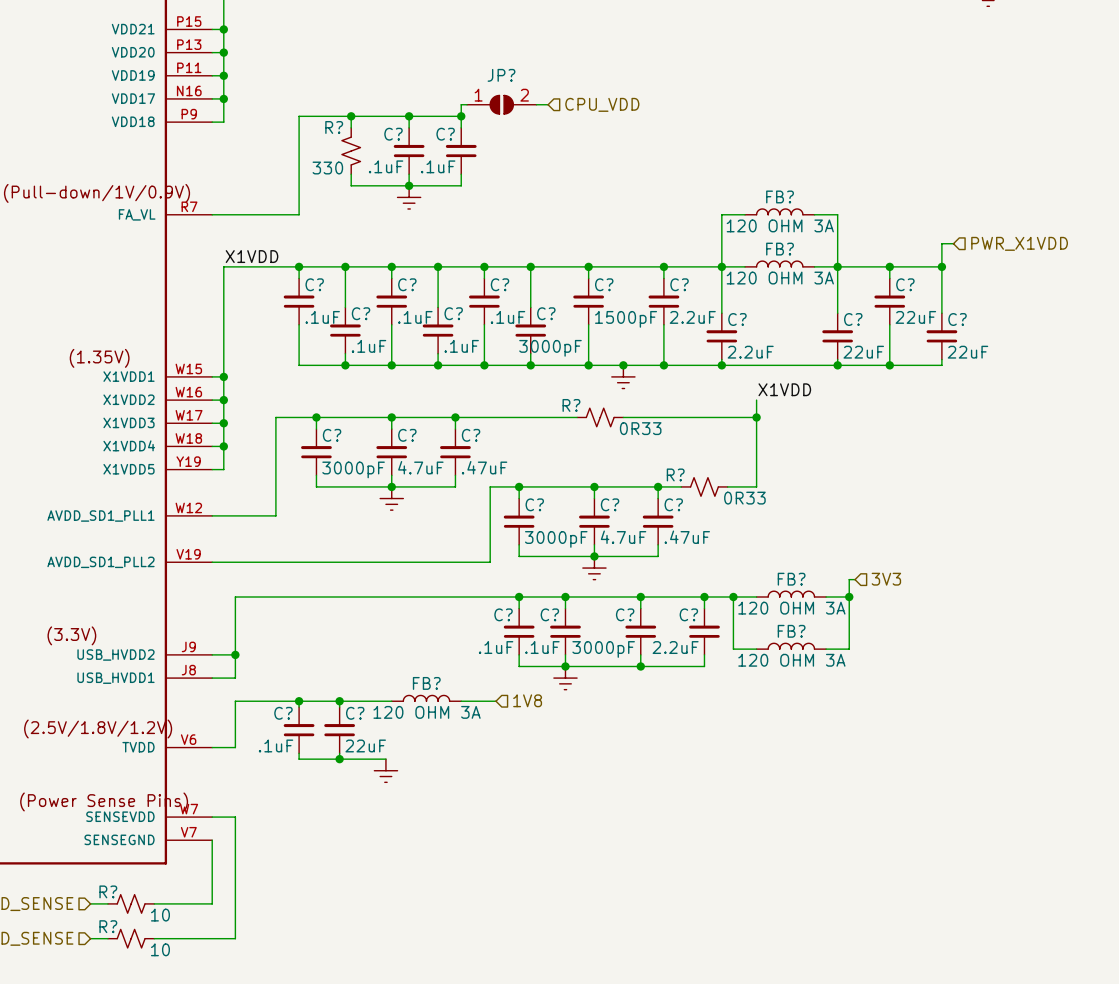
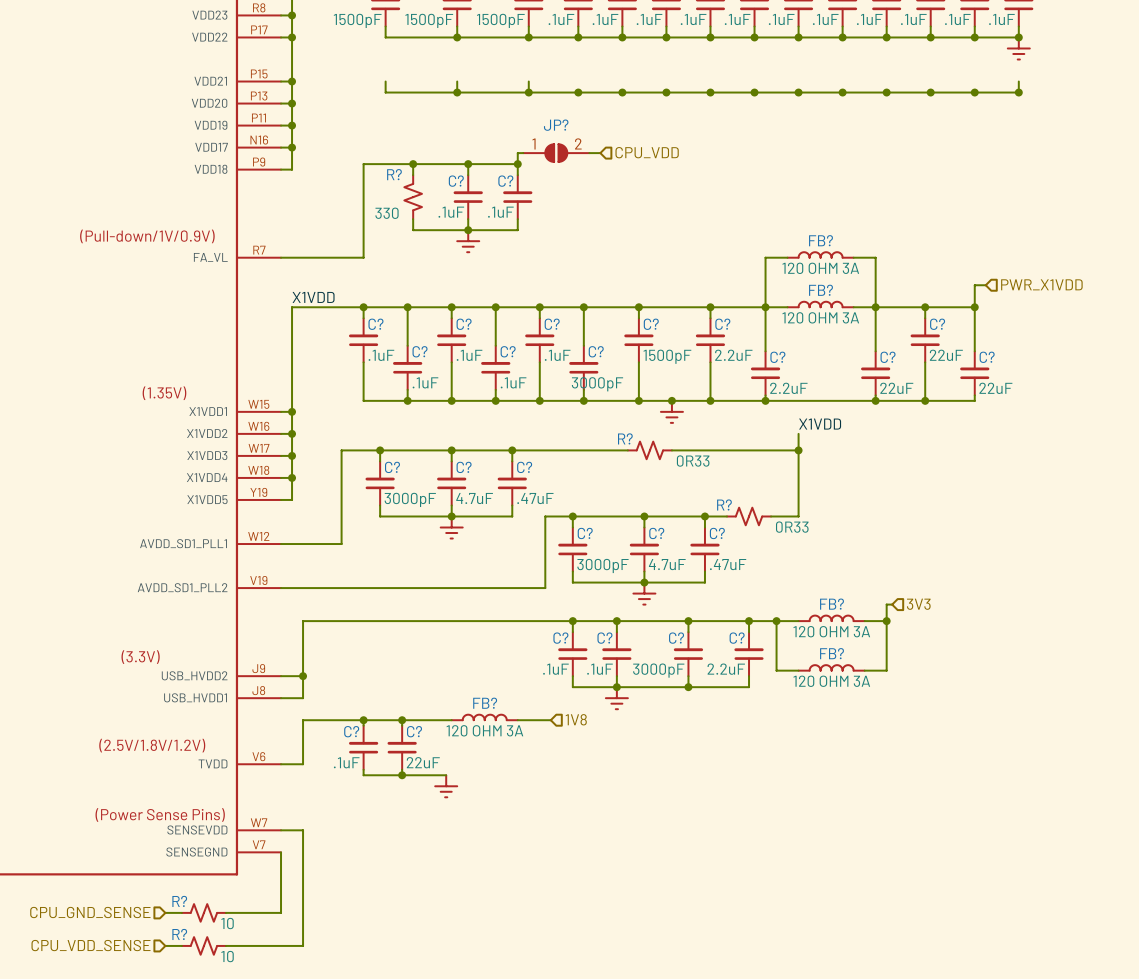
wire: none -> (385, 81) (385, 92) (1018, 92) (1018, 81)
wire: none -> (457, 81) (457, 92)
wire: none -> (528, 81) (528, 92)
junction: none -> (457, 92)
junction: none -> (528, 92)
junction: none -> (578, 92)
junction: none -> (622, 92)
junction: none -> (666, 92)
junction: none -> (710, 92)
junction: none -> (754, 92)
junction: none -> (798, 92)
junction: none -> (842, 92)
junction: none -> (886, 92)
junction: none -> (930, 92)
junction: none -> (974, 92)
junction: none -> (1018, 92)

